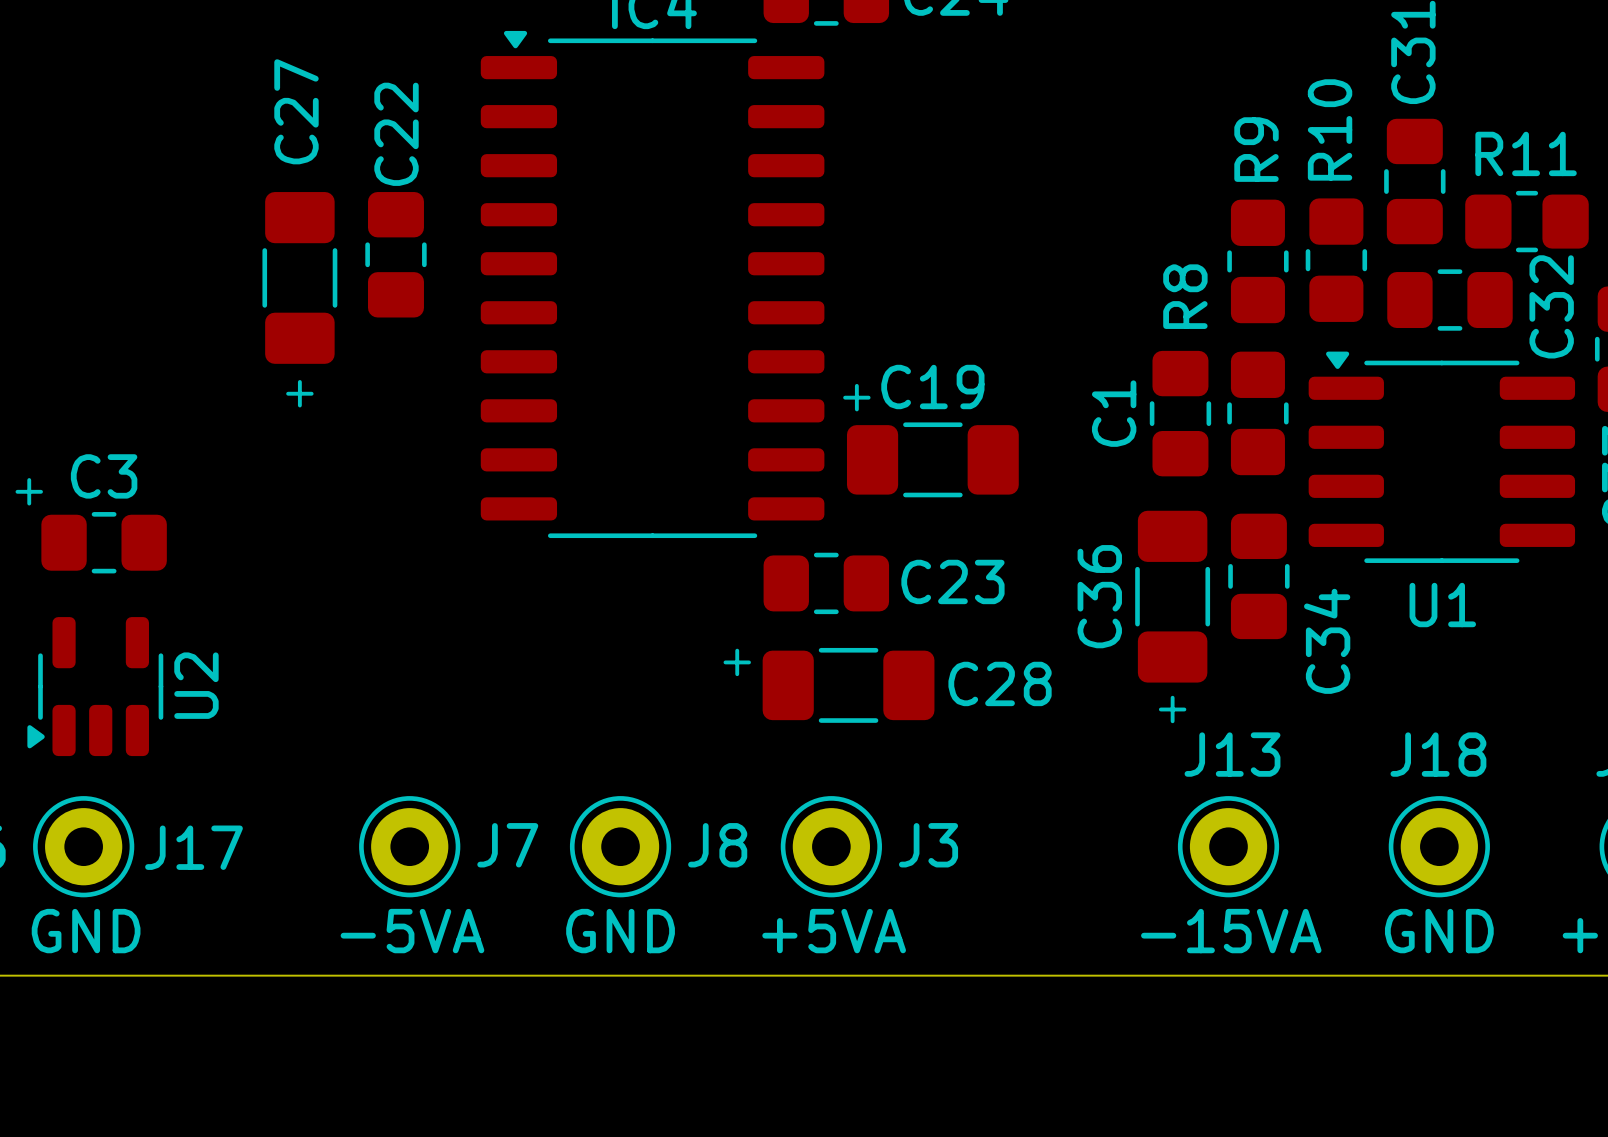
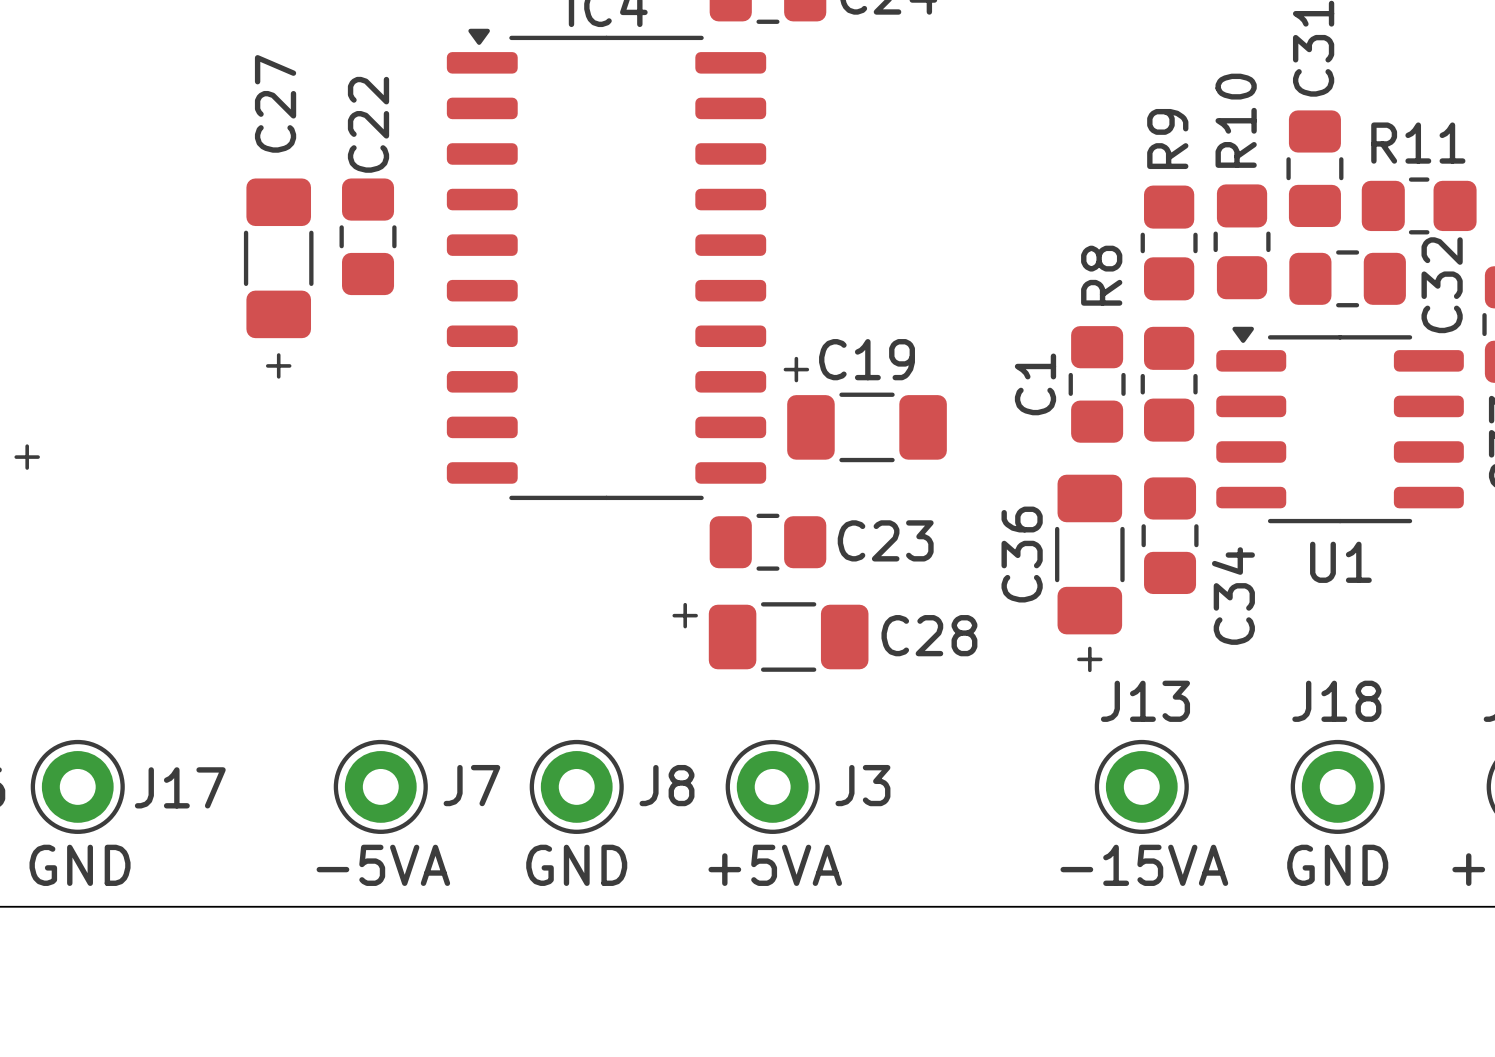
C3: (104, 542) -> none
U2: (95, 686) -> none

